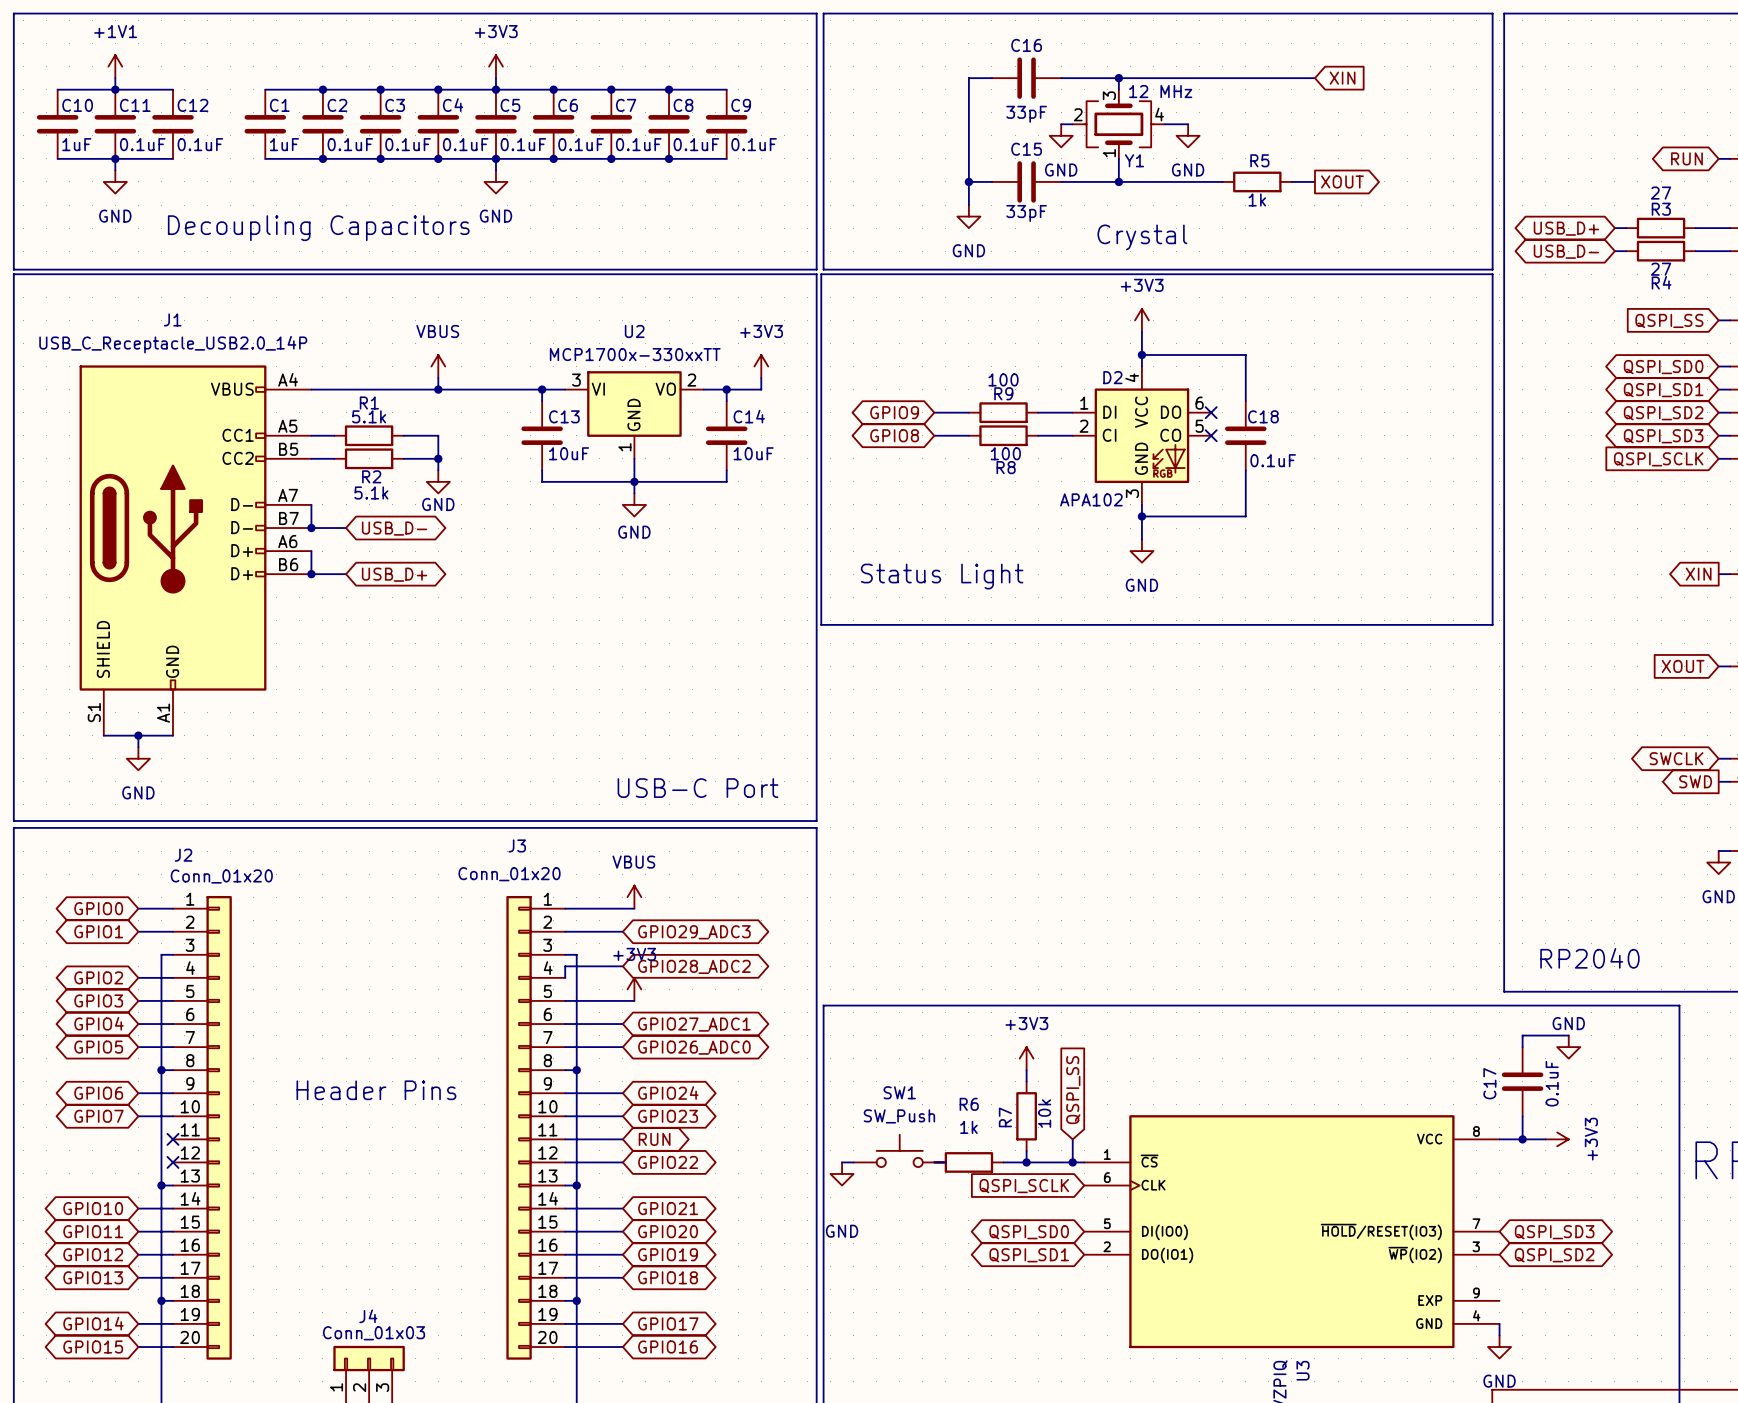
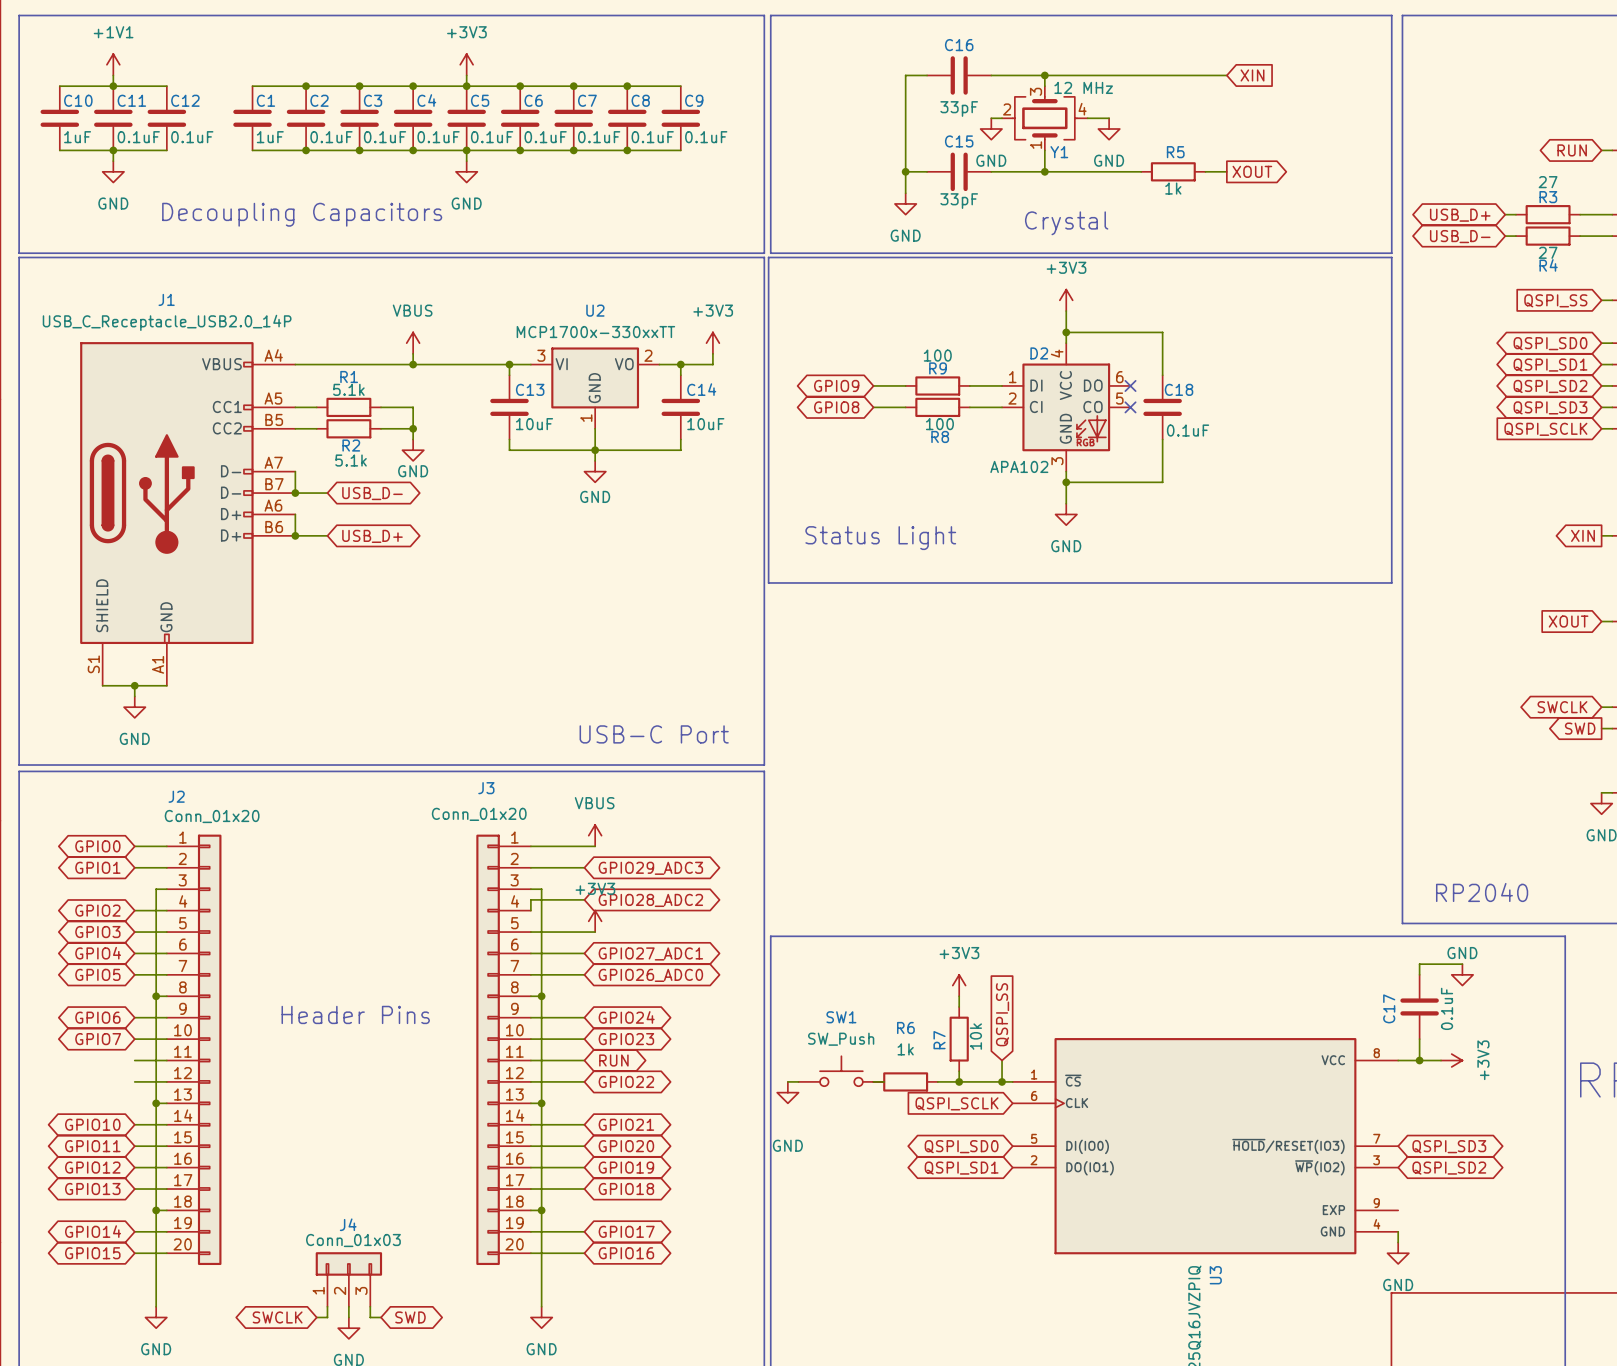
wire: none -> (134, 1060) (166, 1060)
no-connect mark: (173, 1139) -> none
wire: none -> (134, 1081) (166, 1081)
no-connect mark: (173, 1162) -> none

